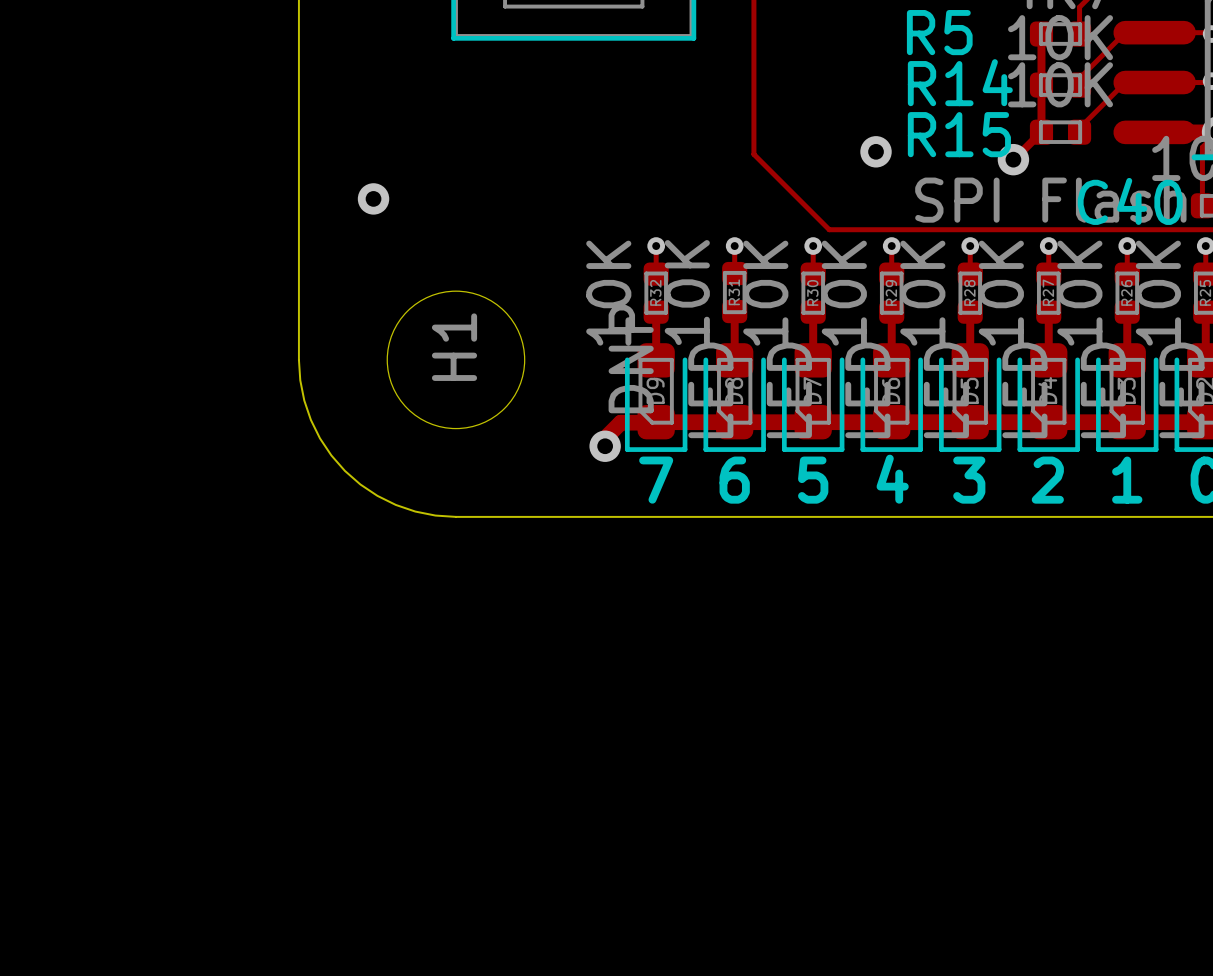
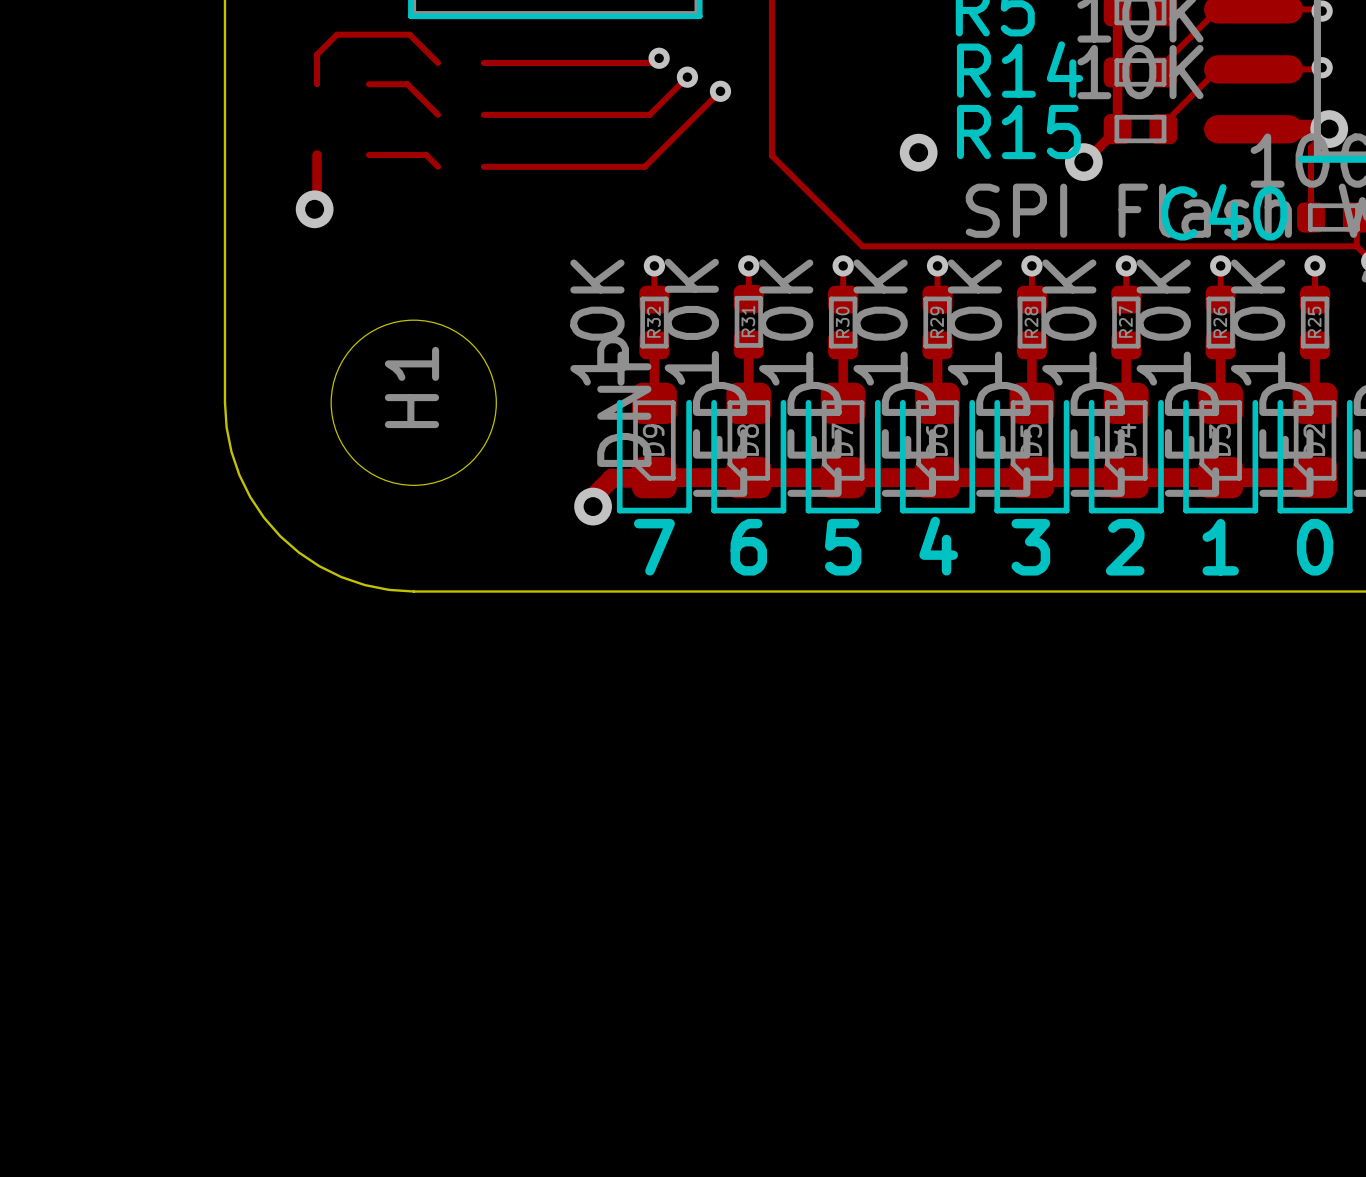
track: none -> (659, 58) (654, 62) (483, 62)
via: none -> (659, 58)
track: none -> (438, 62) (409, 34) (336, 34) (317, 54) (317, 84)
track: none -> (687, 77) (649, 114) (483, 114)
via: none -> (687, 77)
track: none -> (368, 84) (407, 84) (438, 114)
track: none -> (720, 91) (644, 166) (483, 166)
via: none -> (720, 91)
track: none -> (317, 155) (317, 206)
track: none -> (368, 155) (426, 155) (438, 166)

